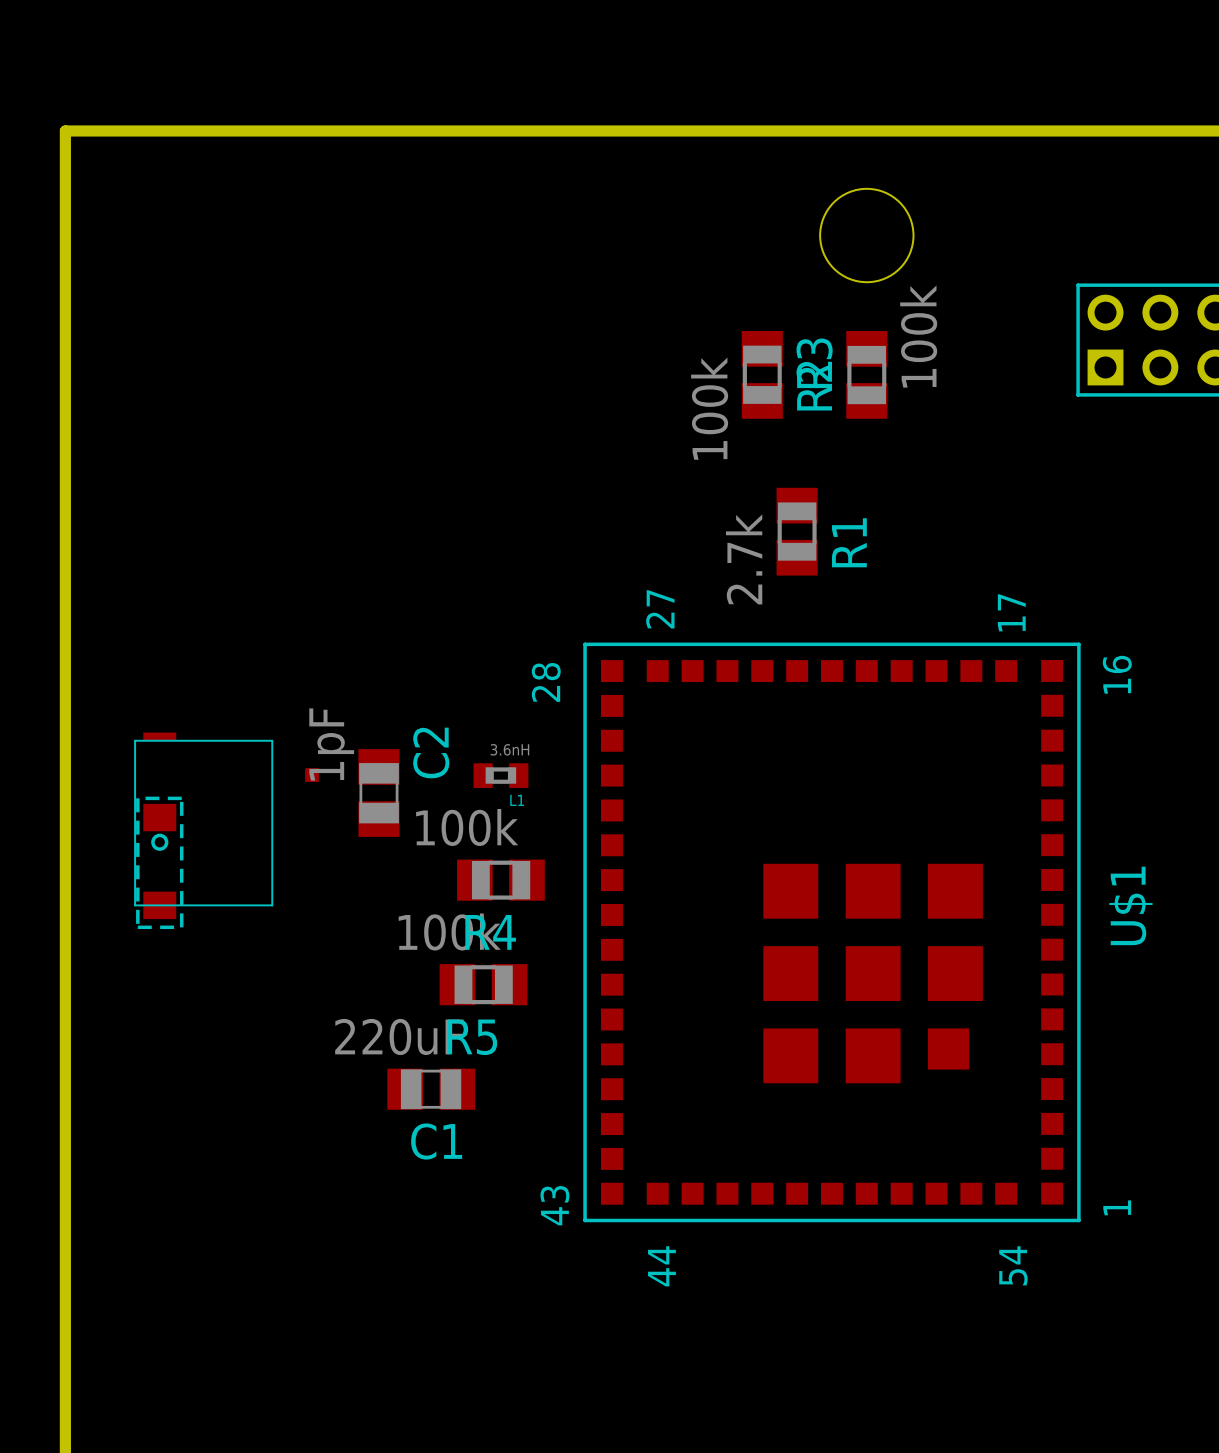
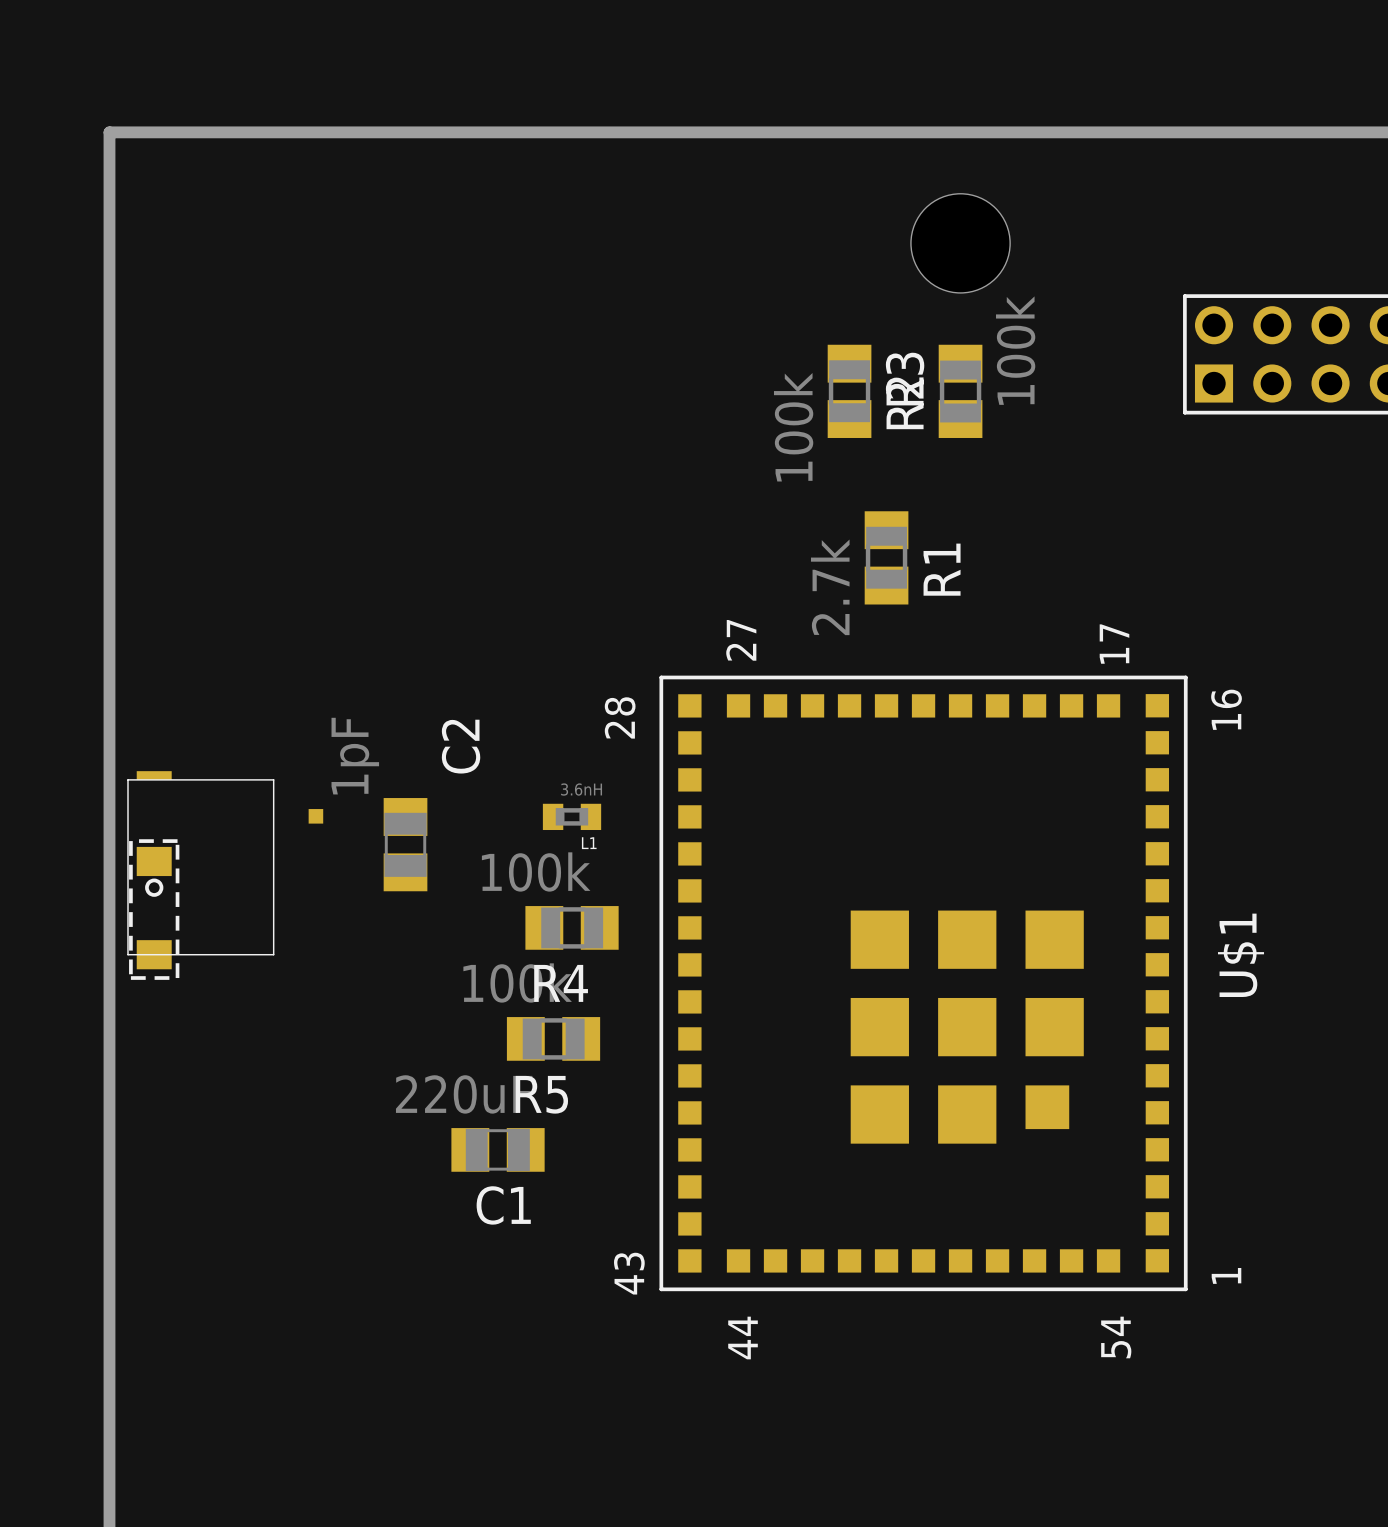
C2 value position: 1pF (331, 744) -> 1pF (355, 756)
C2 name position: C2 (431, 752) -> C2 (461, 746)
C2 position: (378, 793) -> (405, 844)
part position: (226, 830) -> (225, 875)

